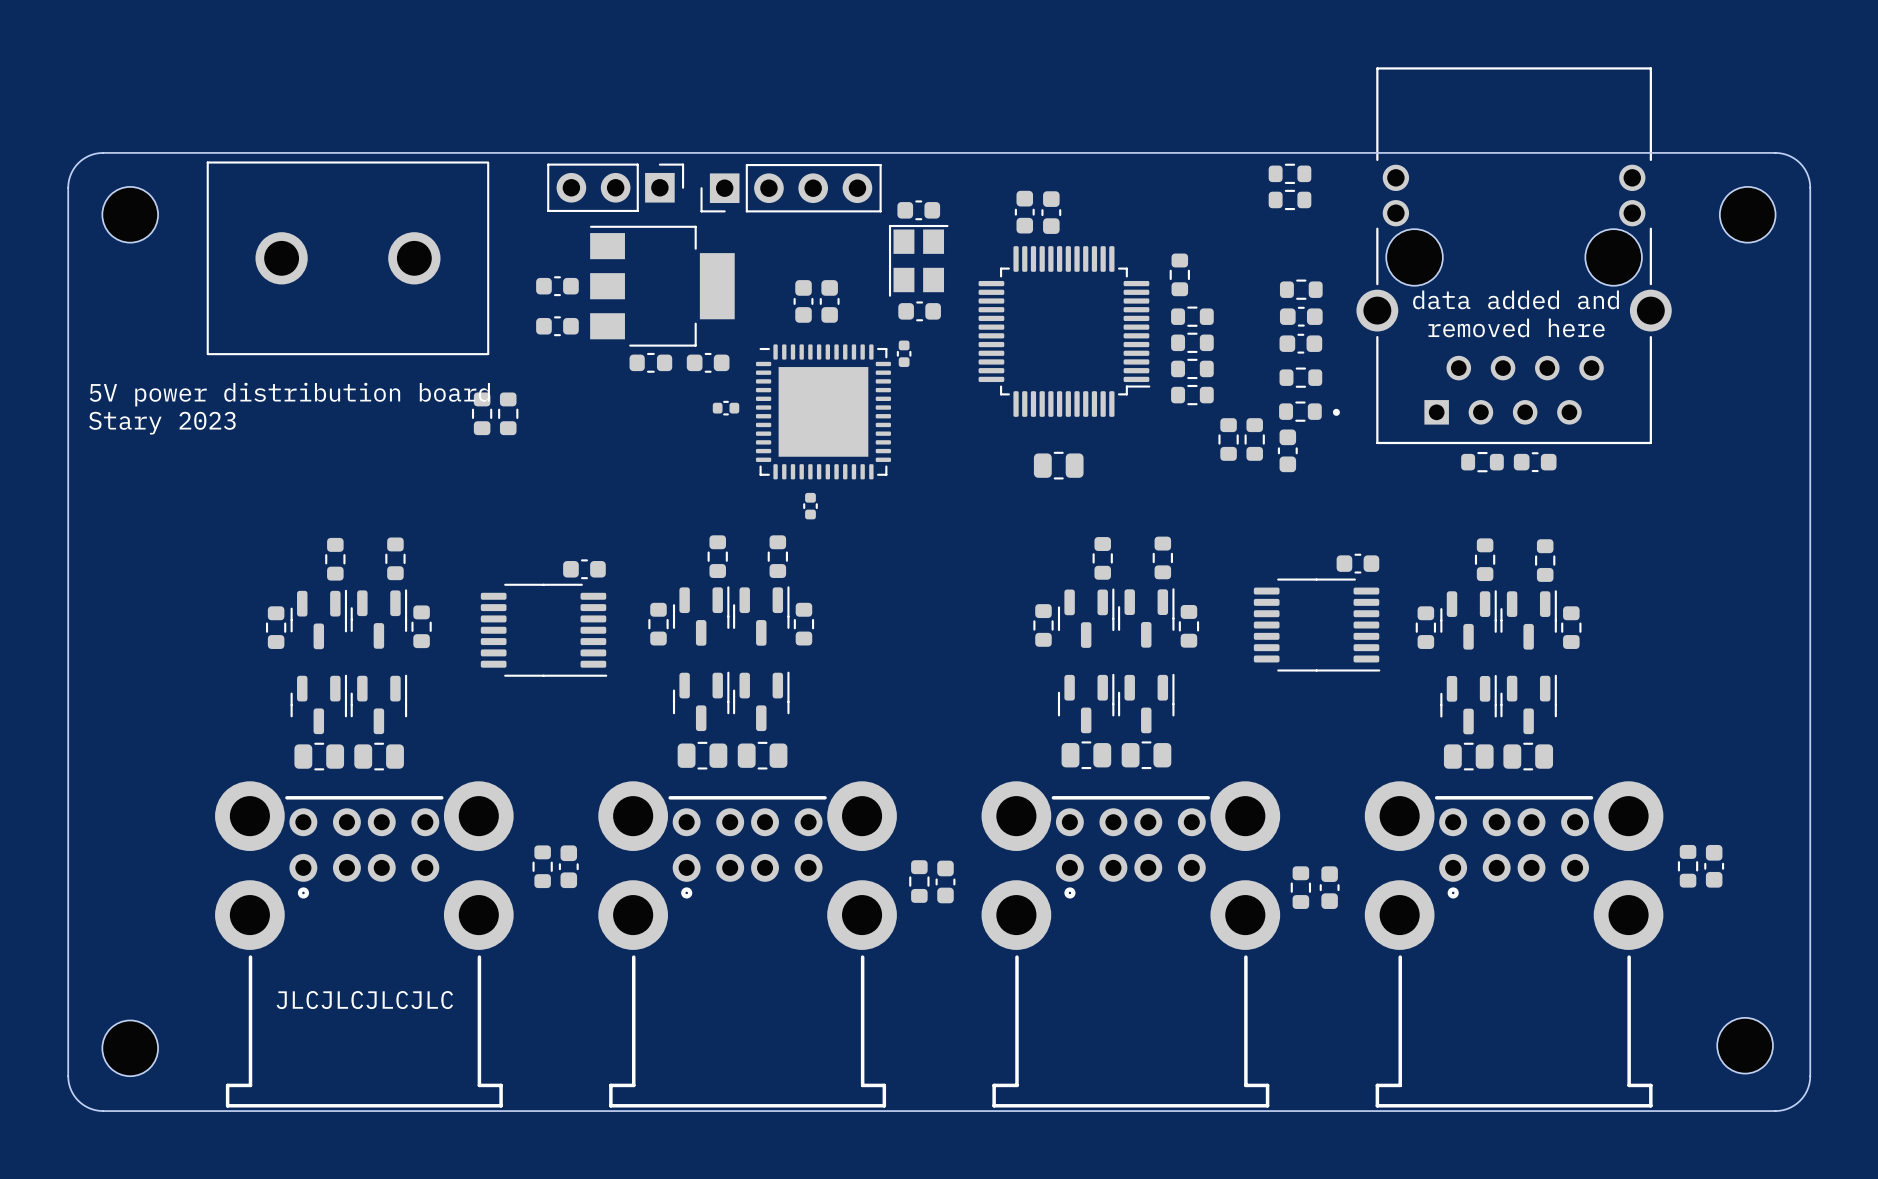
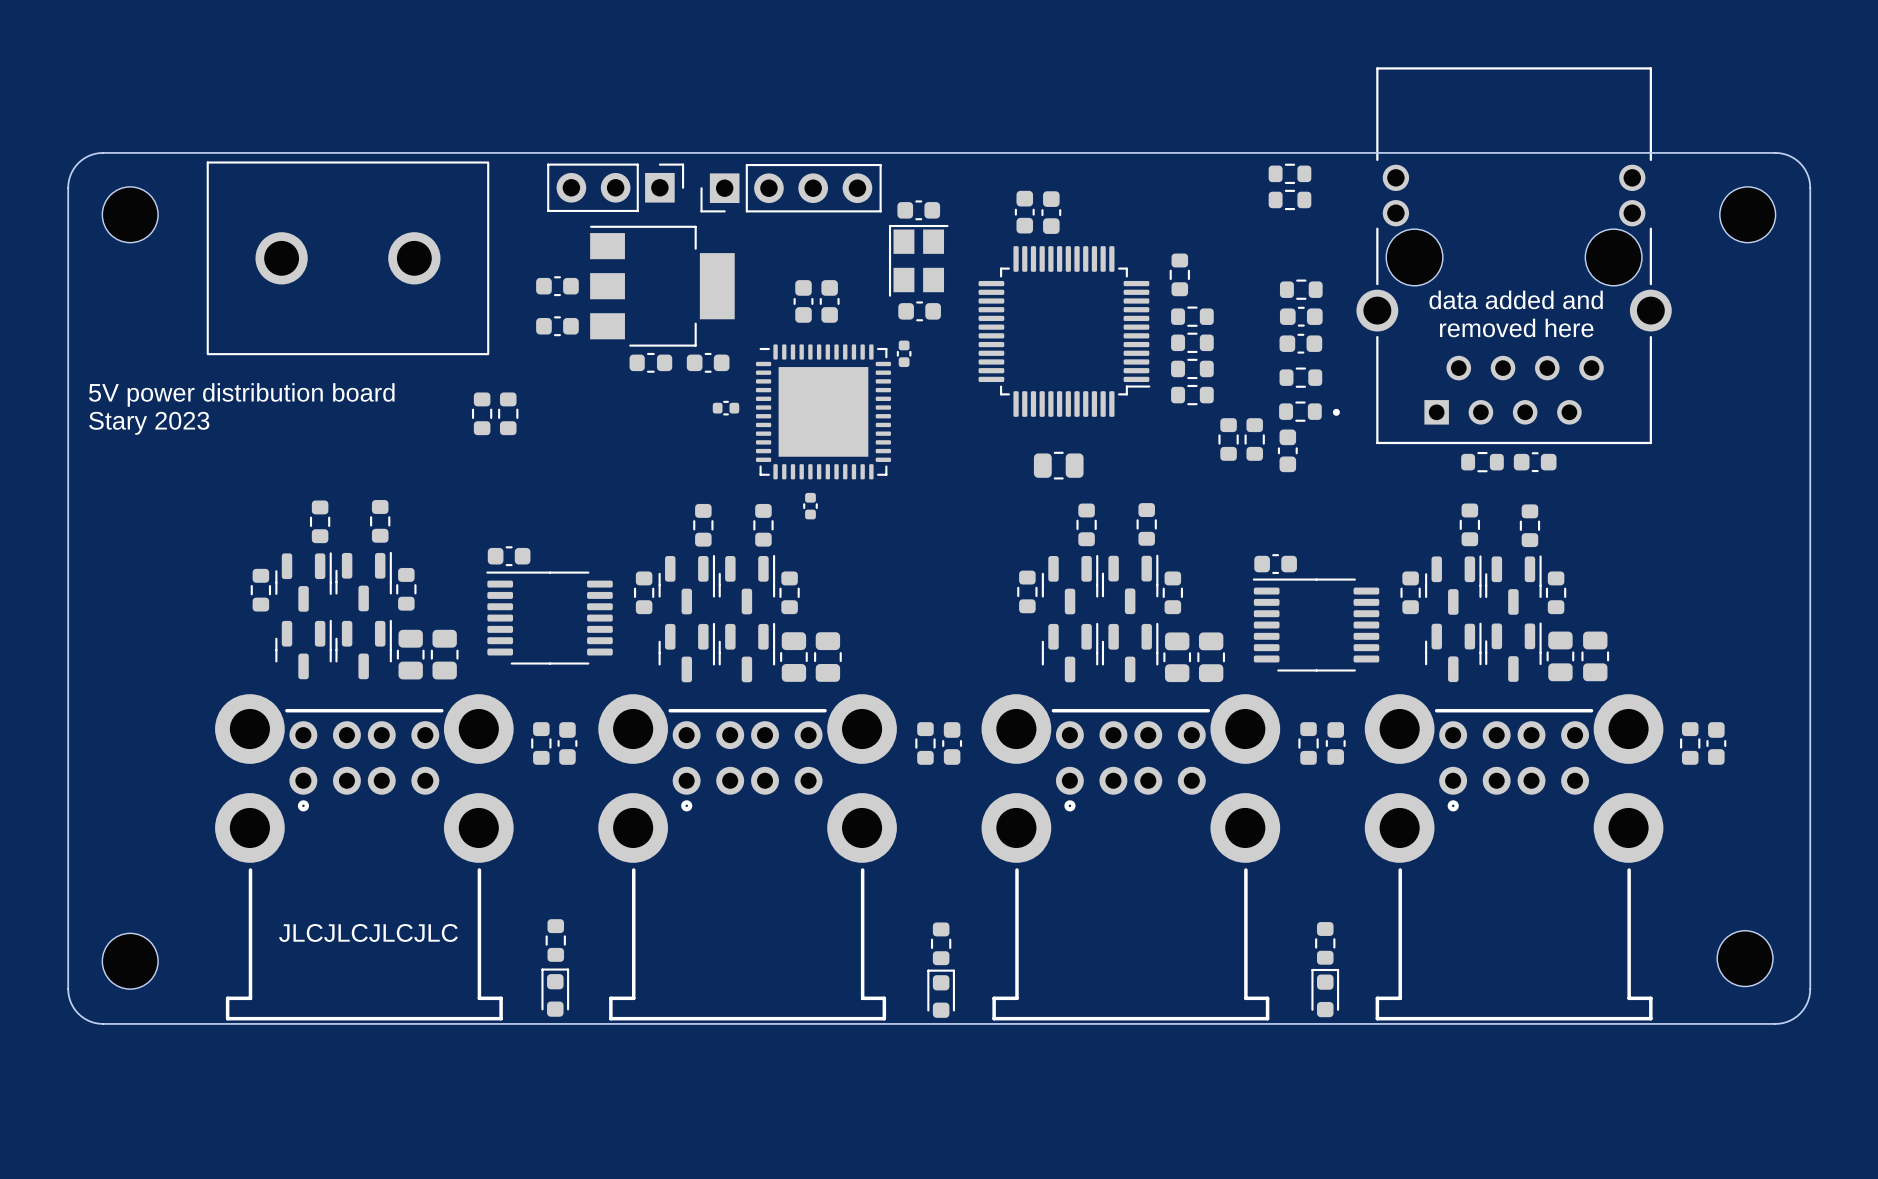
part: none -> (320, 521)
part: none -> (380, 521)
part: none -> (1086, 524)
part: none -> (1146, 524)
part: none -> (1469, 524)
part: none -> (703, 525)
part: none -> (763, 525)
part: none -> (1529, 525)
part: (717, 556) -> none
part: (777, 556) -> none
part: (1162, 557) -> none
part: (395, 558) -> none
part: (1102, 558) -> none
part: (335, 559) -> none
part: (1485, 559) -> none
part: (1545, 560) -> none
part position: (1357, 563) -> (1275, 564)
part position: (584, 569) -> (509, 556)
part: none -> (363, 581)
part: none -> (303, 582)
part: none -> (686, 584)
part: none -> (746, 584)
part: none -> (1070, 584)
part: none -> (1130, 584)
part: none -> (1453, 585)
part: none -> (1513, 585)
part: none -> (406, 589)
part: none -> (260, 590)
part: none -> (789, 592)
part: none -> (1172, 592)
part: none -> (1556, 592)
part: (701, 616) -> none
part: (761, 616) -> none
part: (1146, 617) -> none
part: (1086, 618) -> none
part: (318, 619) -> none
part: (378, 619) -> none
part: (1468, 619) -> none
part: (1528, 619) -> none
part position: (658, 624) -> (644, 592)
part: (803, 624) -> none
part position: (1043, 625) -> (1027, 591)
part rotation: 0° (1317, 625) -> 180° (1316, 625)
part: (421, 626) -> none
part: (1188, 626) -> none
part: (276, 627) -> none
part position: (1425, 627) -> (1410, 592)
part: (1571, 627) -> none
part rotation: 0° (544, 630) -> 180° (549, 618)
part: none -> (303, 649)
part: none -> (363, 649)
part: none -> (686, 652)
part: none -> (746, 652)
part: none -> (1070, 652)
part: none -> (1130, 652)
part: none -> (1453, 652)
part: none -> (1513, 652)
part: none -> (410, 654)
part: none -> (444, 654)
part: none -> (1560, 656)
part: none -> (1595, 656)
part: none -> (793, 657)
part: none -> (827, 657)
part: none -> (1177, 657)
part: none -> (1211, 657)
part: (701, 701) -> none
part: (761, 701) -> none
part: (1086, 703) -> none
part: (1146, 703) -> none
part: (318, 704) -> none
part: (378, 704) -> none
part: (1468, 704) -> none
part: (1528, 704) -> none
part: none -> (541, 743)
part: none -> (567, 743)
part: none -> (925, 743)
part: none -> (1308, 743)
part: none -> (1335, 743)
part: none -> (1690, 743)
part: (702, 755) -> none
part: (762, 755) -> none
part: (1086, 755) -> none
part: (1146, 755) -> none
part: (319, 756) -> none
part: (379, 756) -> none
part: (1468, 756) -> none
part: (1528, 756) -> none
part: (542, 866) -> none
part: (568, 866) -> none
part: (1688, 866) -> none
part position: (1714, 866) -> (1716, 743)
part position: (919, 881) -> (941, 943)
part position: (945, 881) -> (952, 743)
part position: (1300, 887) -> (1325, 943)
part: (1329, 887) -> none
part: none -> (555, 940)
part position: (364, 944) -> (364, 857)
part position: (747, 944) -> (747, 857)
part position: (1130, 944) -> (1130, 857)
part position: (1514, 944) -> (1514, 857)
board edge: (68, 989) (69, 1083) (73, 1094) (81, 1103) (91, 1109) (103, 1111) (1779, 1110) (1797, 1103) (1804, 1094) (1809, 1083) (1810, 989) -> (68, 989) (70, 1000) (78, 1013) (91, 1021) (103, 1023) (1775, 1023) (1786, 1021) (1800, 1013) (1806, 1004) (1810, 989)
part: none -> (555, 992)
part: none -> (941, 993)
part: none -> (1325, 993)
text position: JLCJLCJLCJLC (364, 1000) -> JLCJLCJLCJLC (368, 932)
part position: (1745, 1045) -> (1745, 958)
part position: (130, 1048) -> (130, 961)

